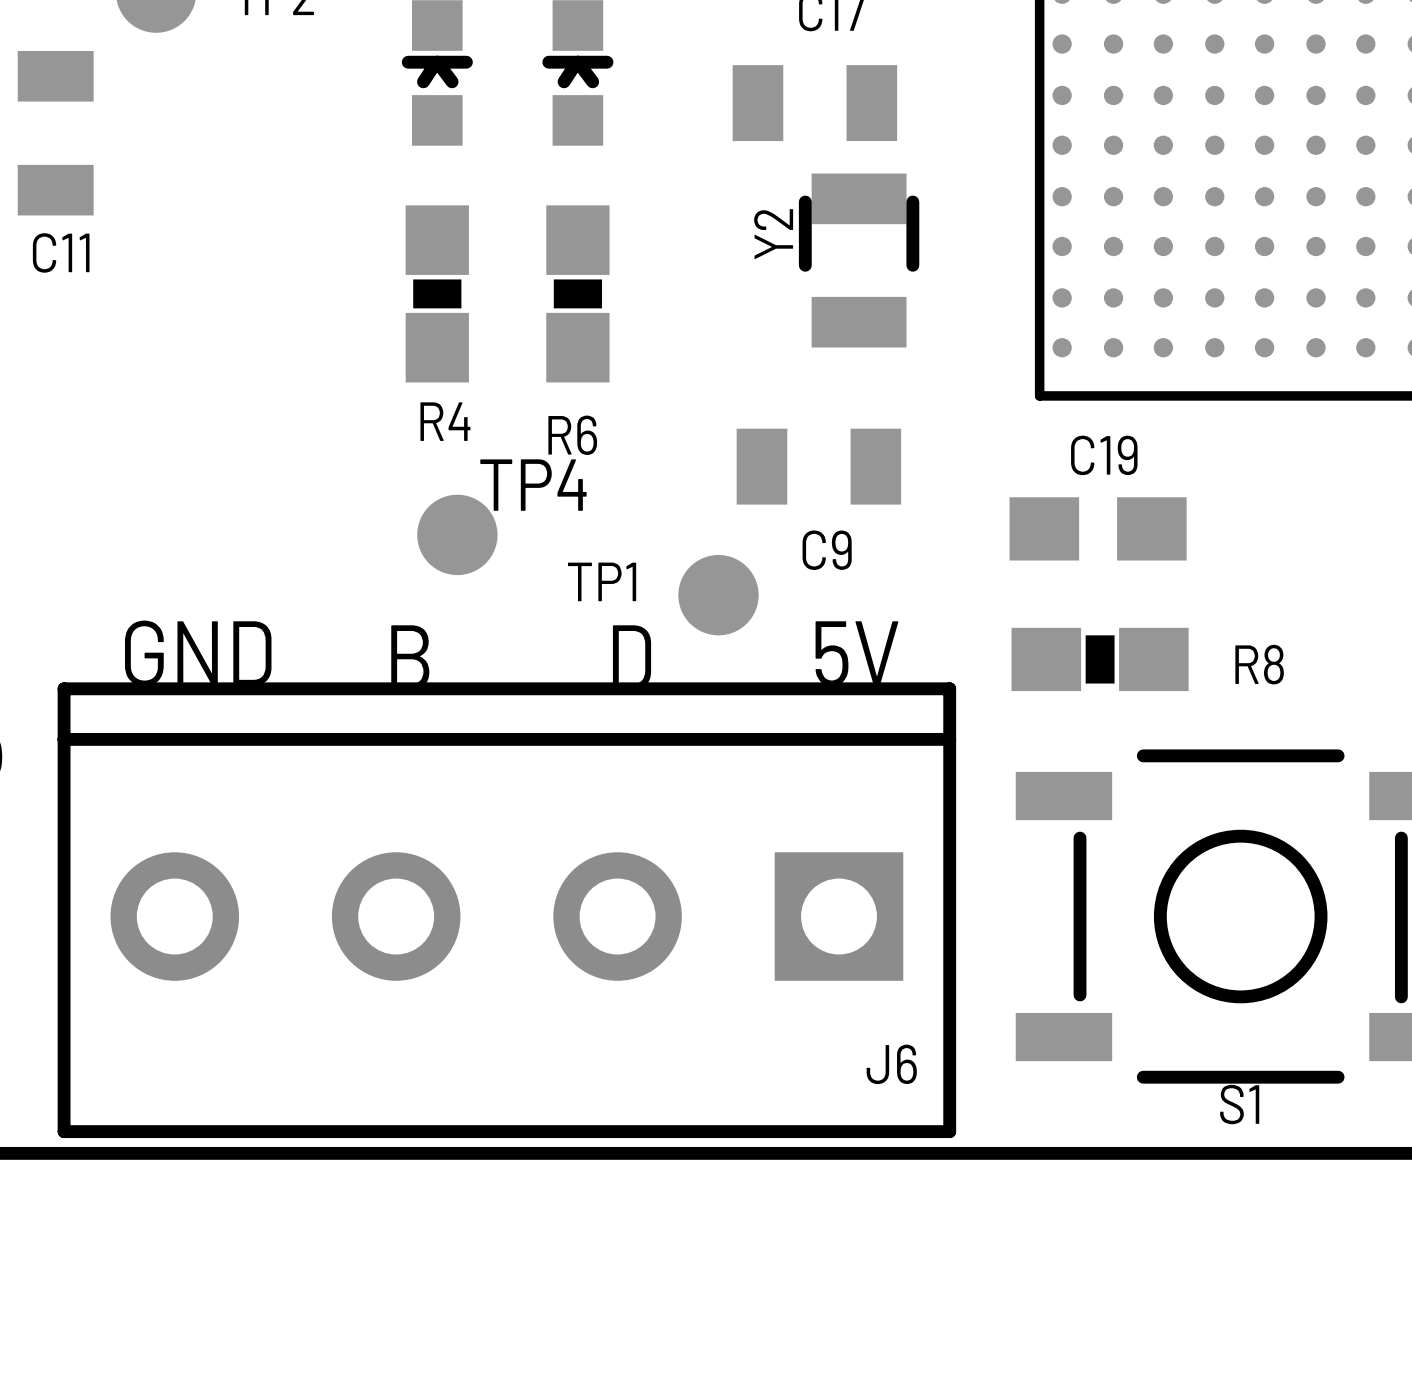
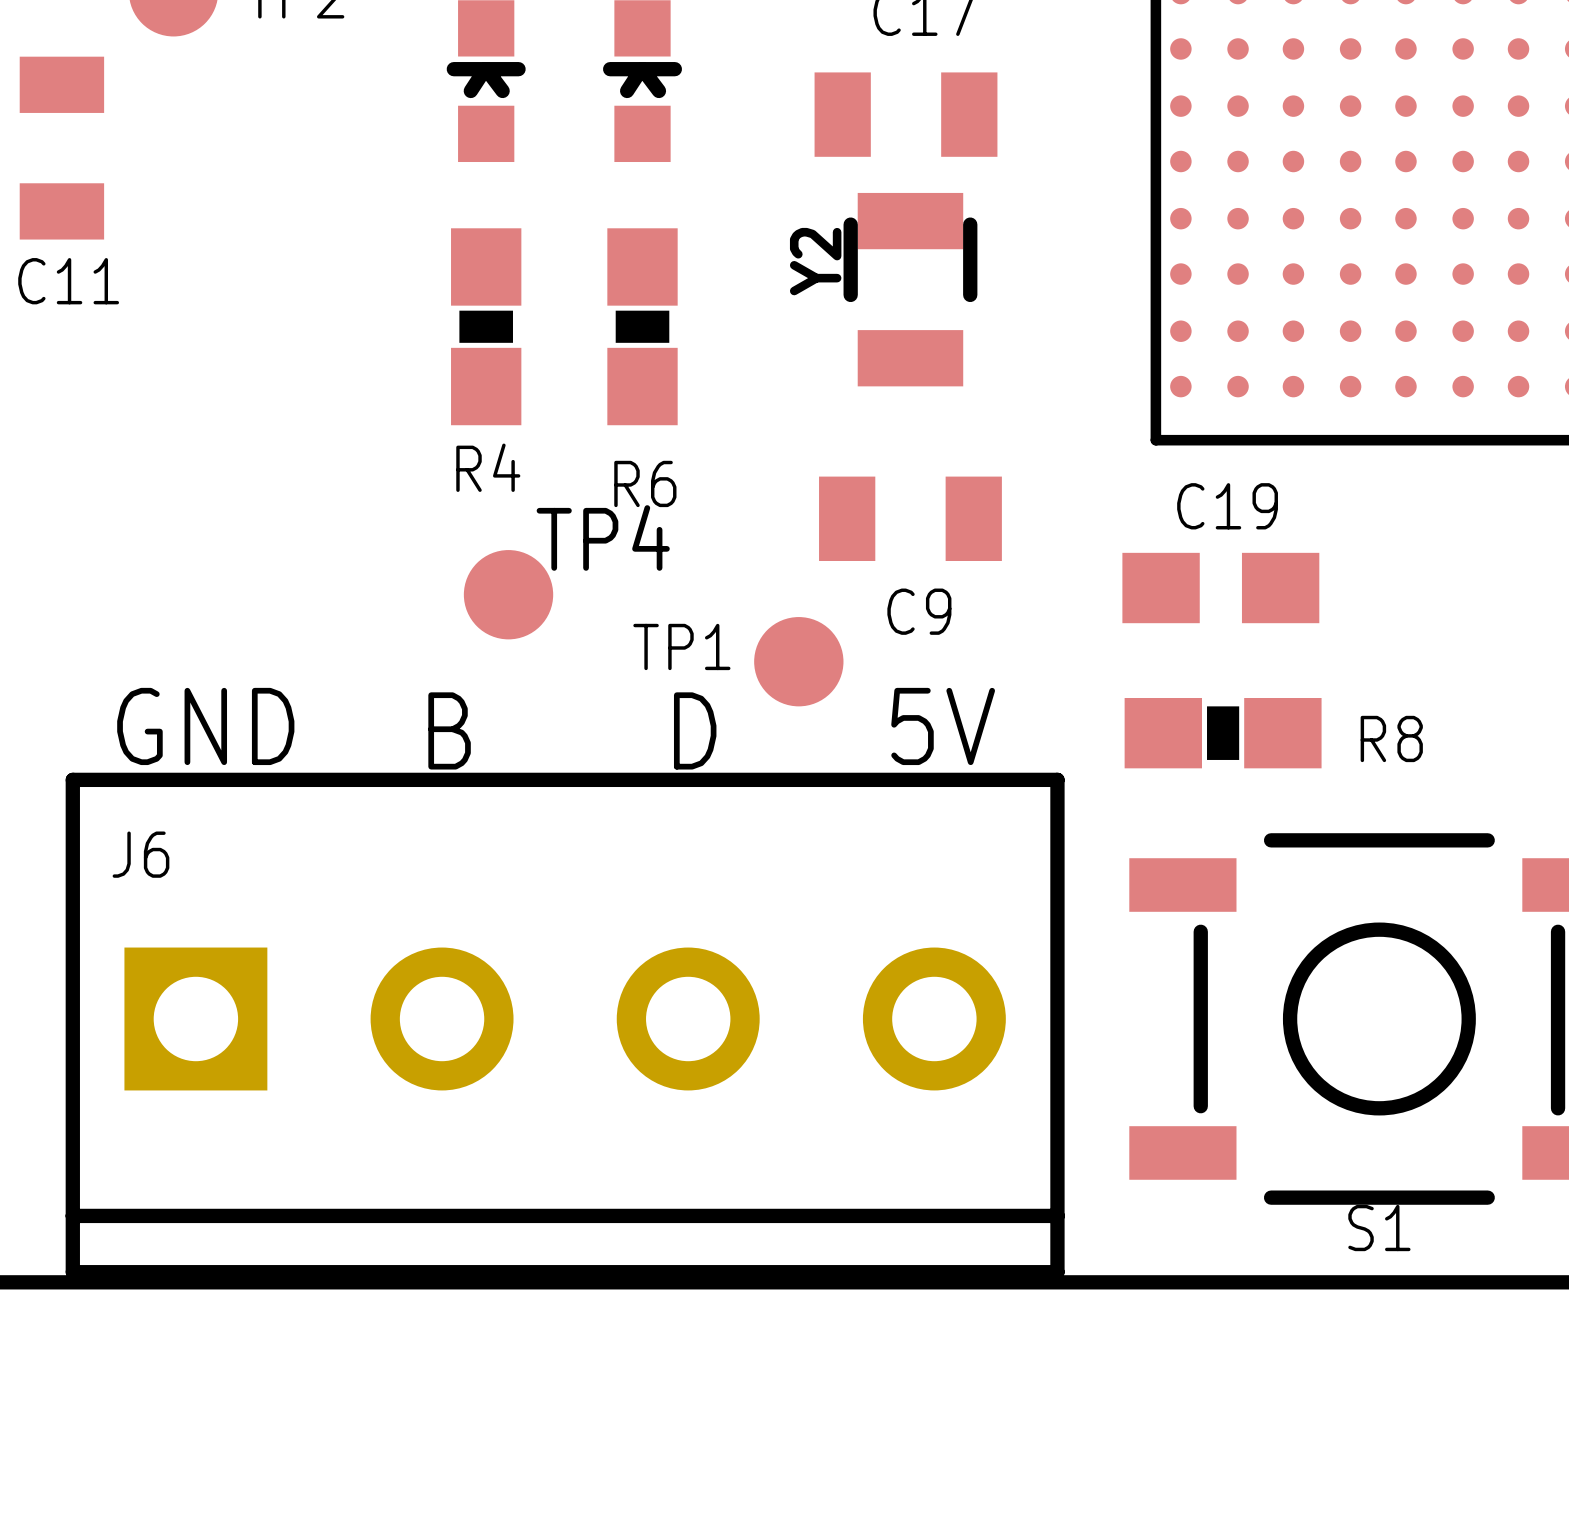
Y2 position: (859, 260) -> (910, 289)
J6 rotation: 0° (506, 910) -> 180° (565, 1026)

